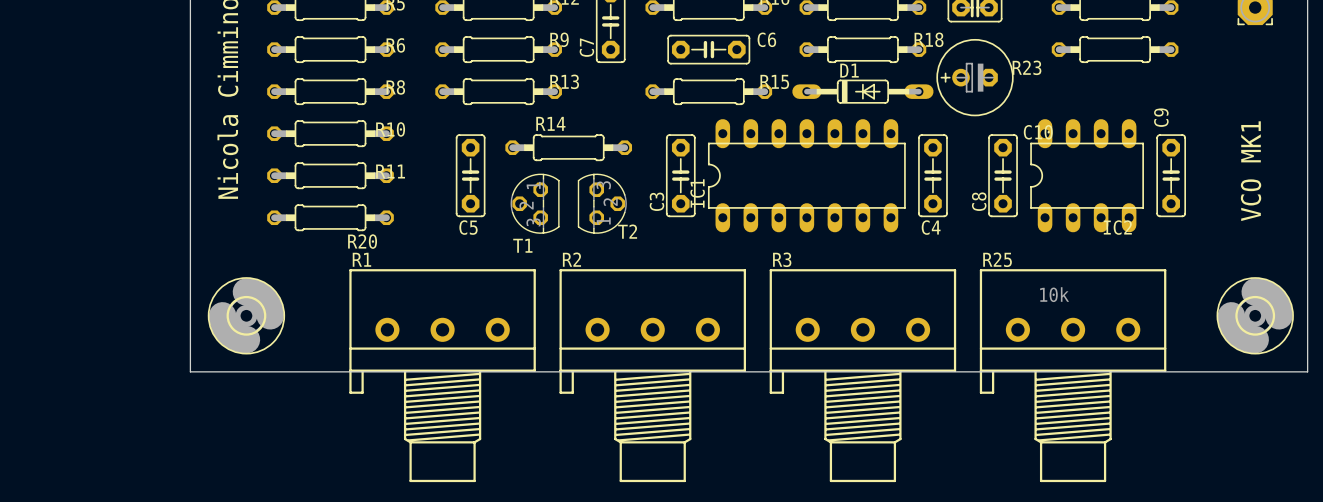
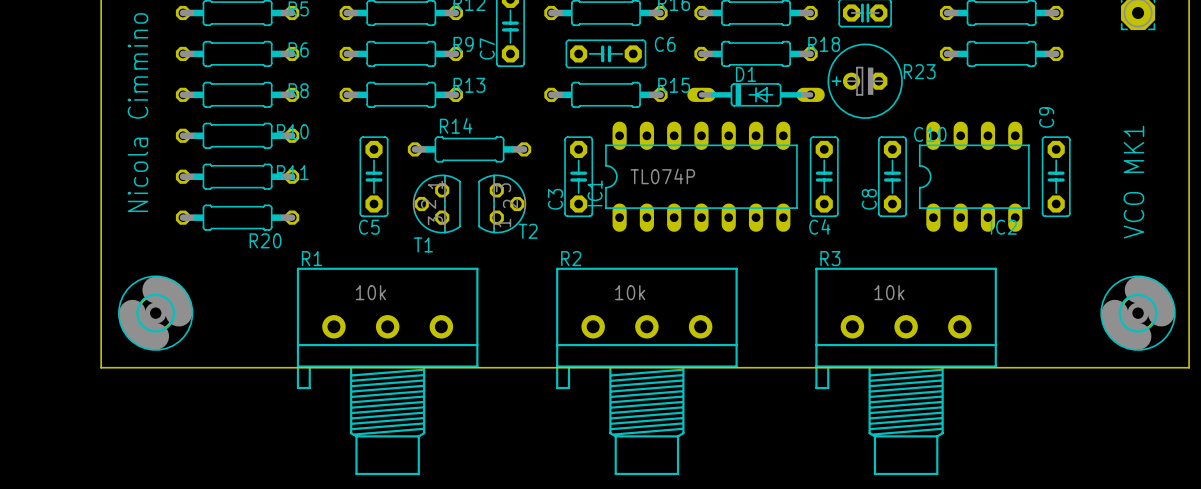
IC1 value: none -> TL074P (662, 176)
R1 value: none -> 10k (370, 292)
R2 value: none -> 10k (630, 292)
R3 value: none -> 10k (889, 292)
R1 position: (442, 375) -> (387, 371)
R2 position: (652, 375) -> (646, 371)
R3 position: (862, 375) -> (906, 371)
R25: 10k (1073, 375) -> none

